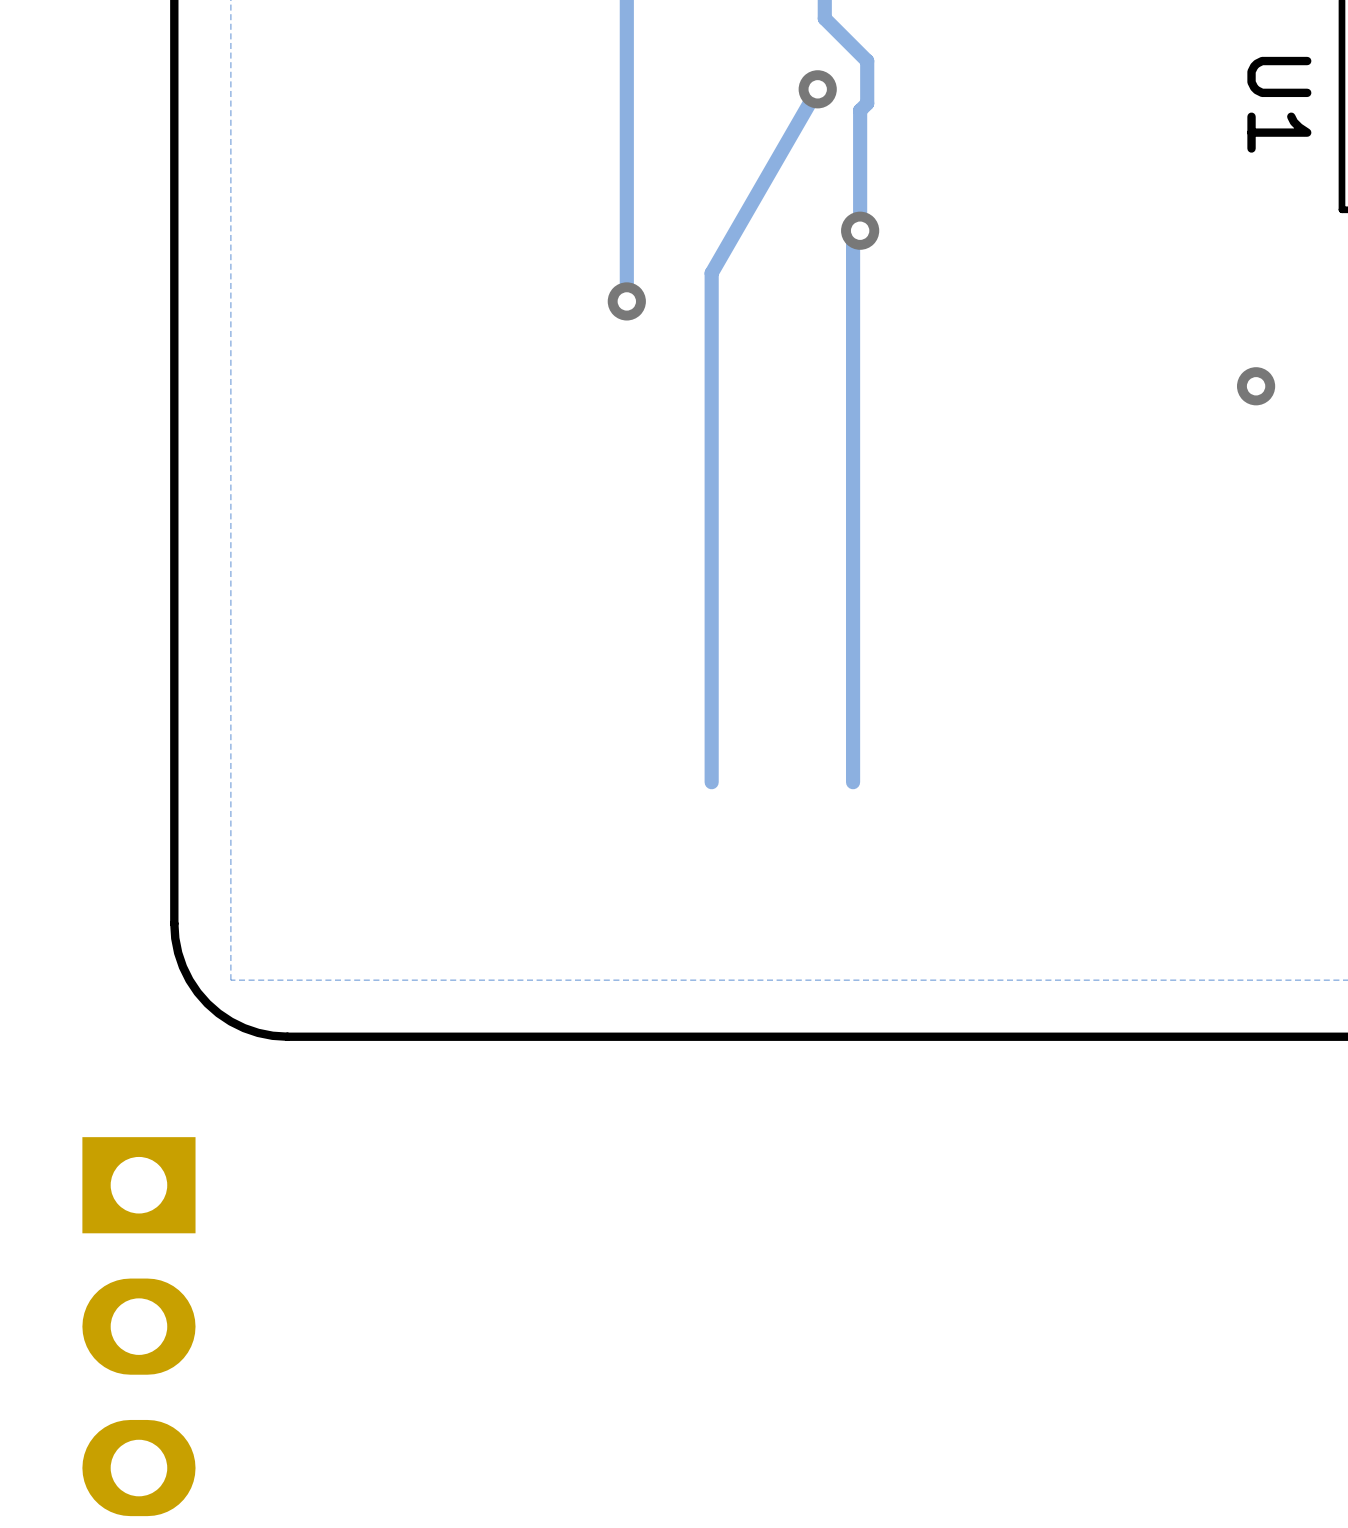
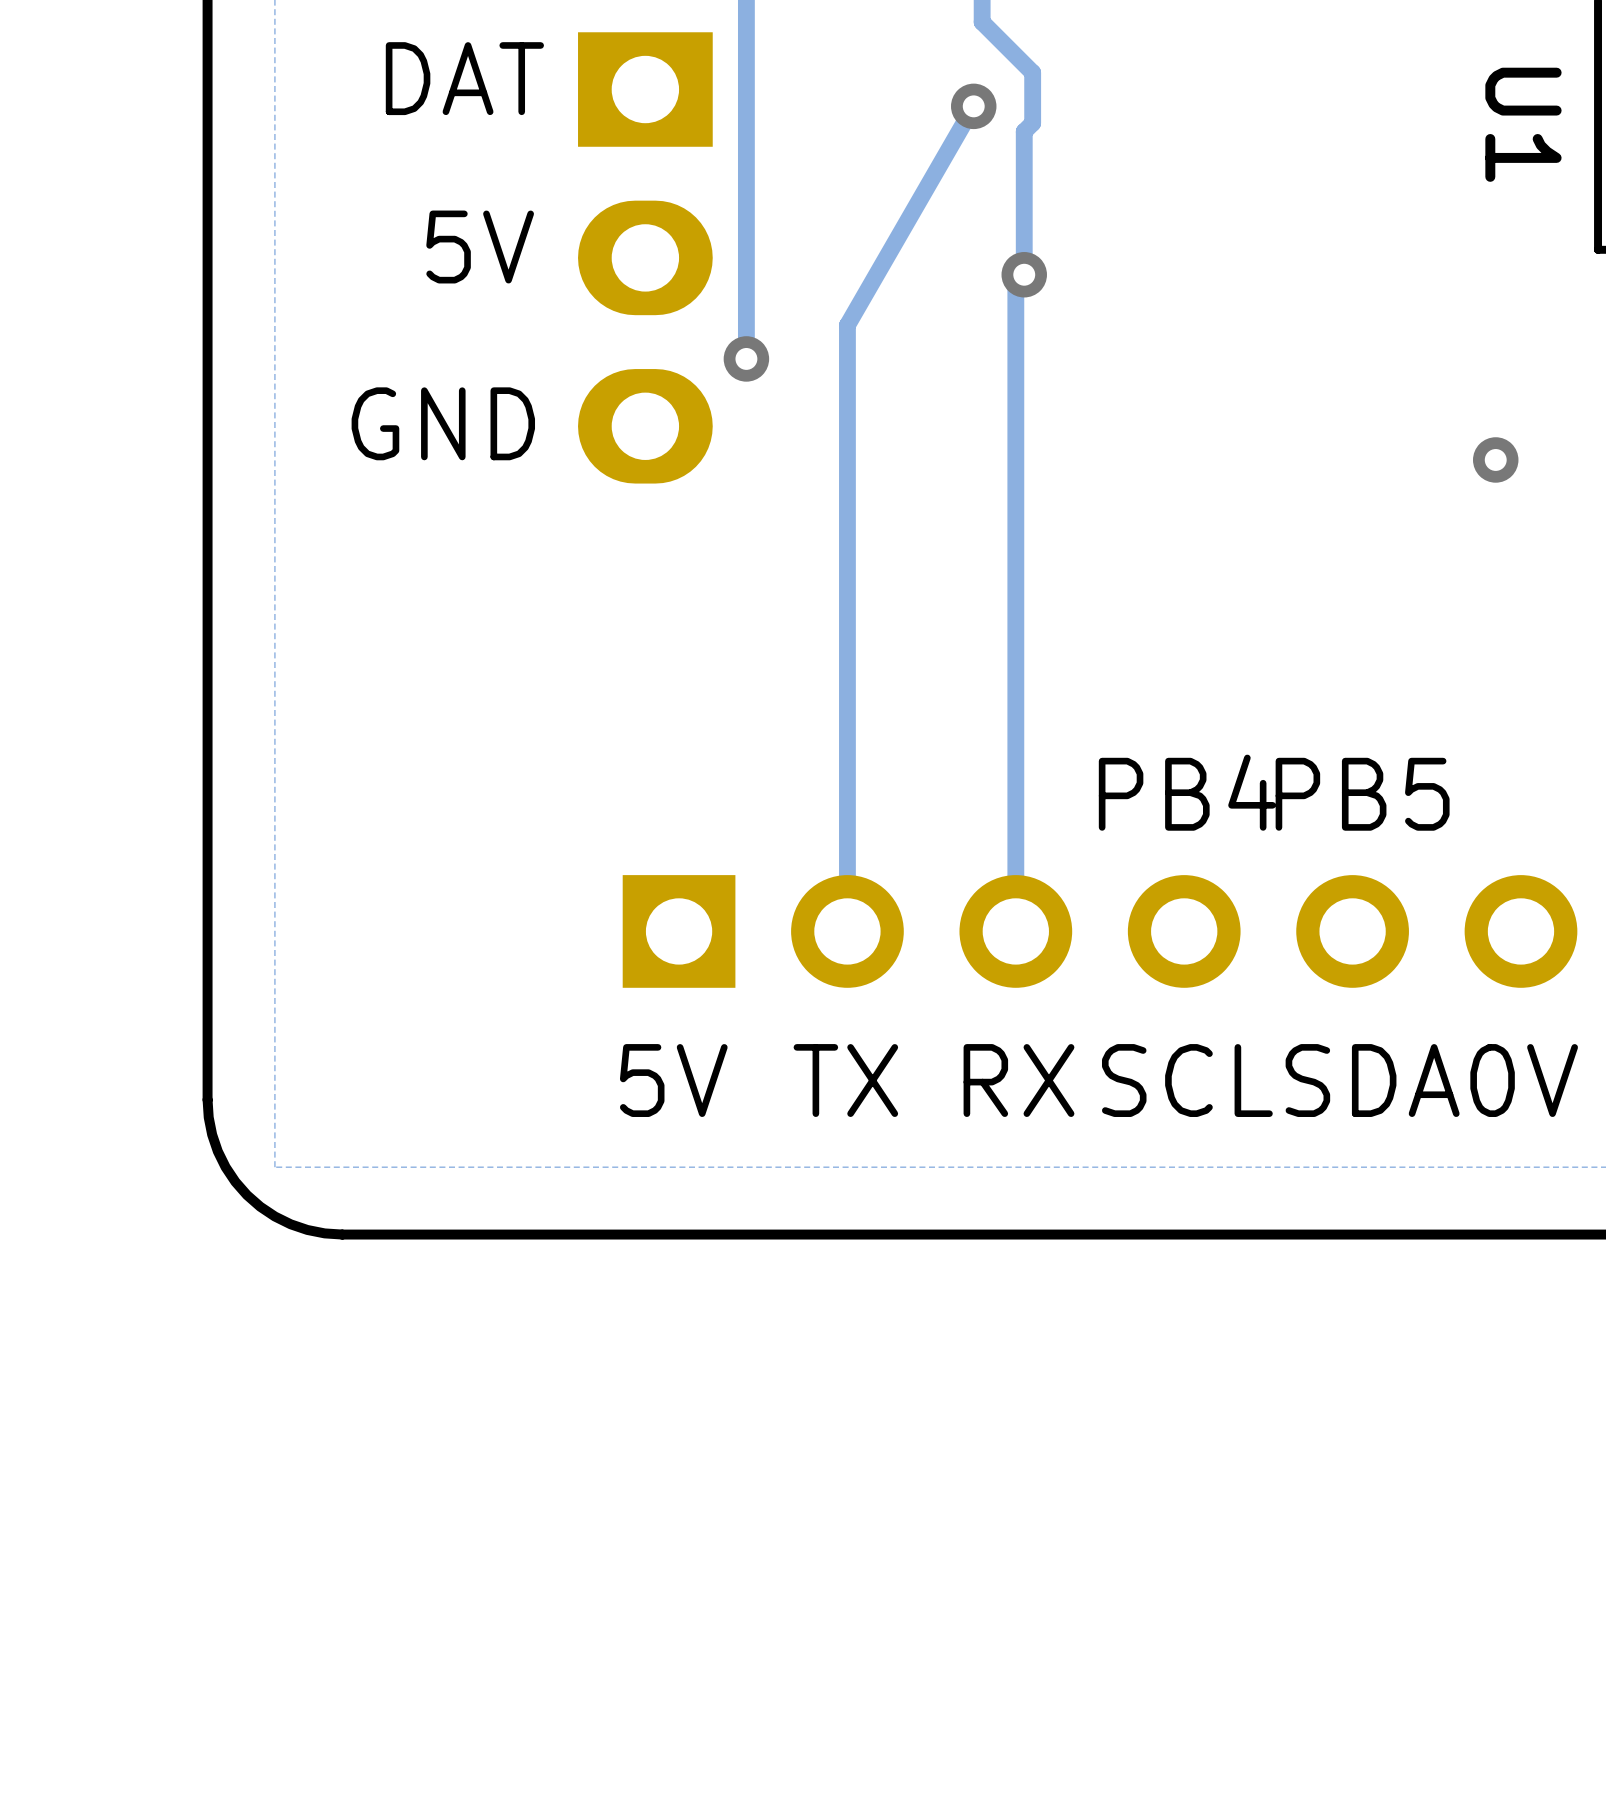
text: none -> DAT (464, 78)
text: none -> 5V (480, 247)
text: none -> GND (443, 423)
text: none -> PB4 (1187, 792)
text: none -> PB5 (1362, 794)
part: none -> (1100, 931)
text: none -> 5V (673, 1080)
text: none -> TX (845, 1080)
text: none -> RX (1018, 1080)
text: none -> SCL (1187, 1080)
text: none -> SDA (1372, 1080)
text: none -> 0V (1524, 1080)
part position: (138, 1326) -> (645, 257)

